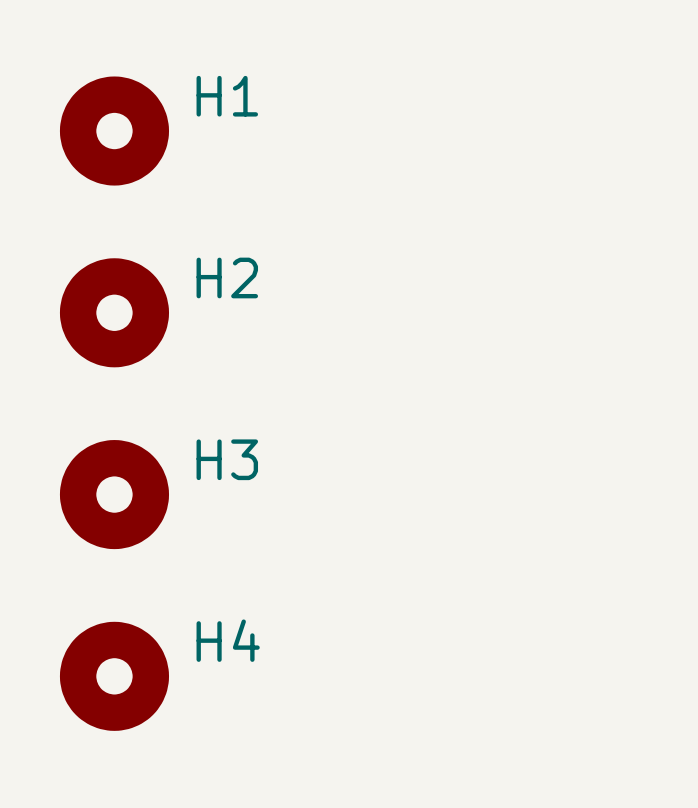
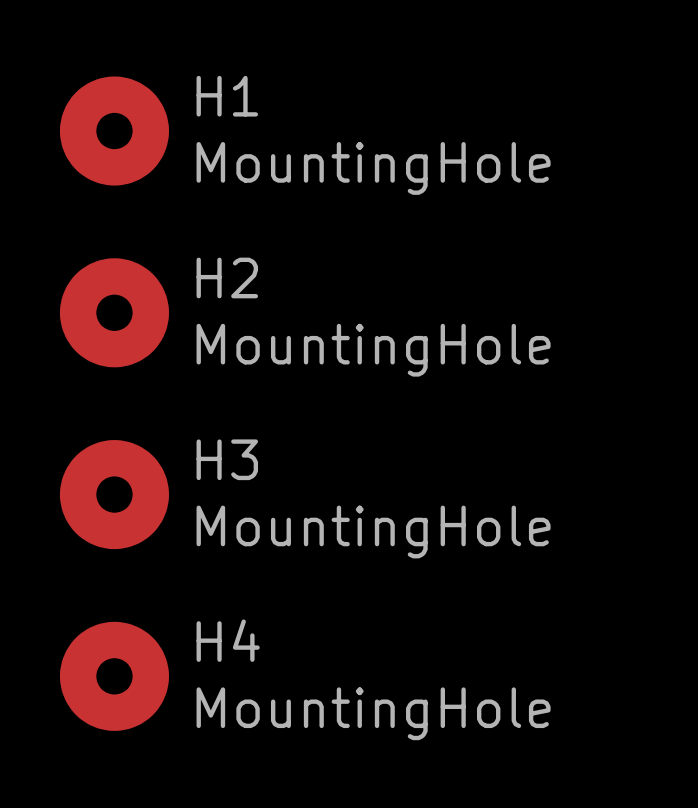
H1 value: none -> MountingHole (373, 168)
H2 value: none -> MountingHole (373, 350)
H3 value: none -> MountingHole (373, 531)
H4 value: none -> MountingHole (373, 713)

